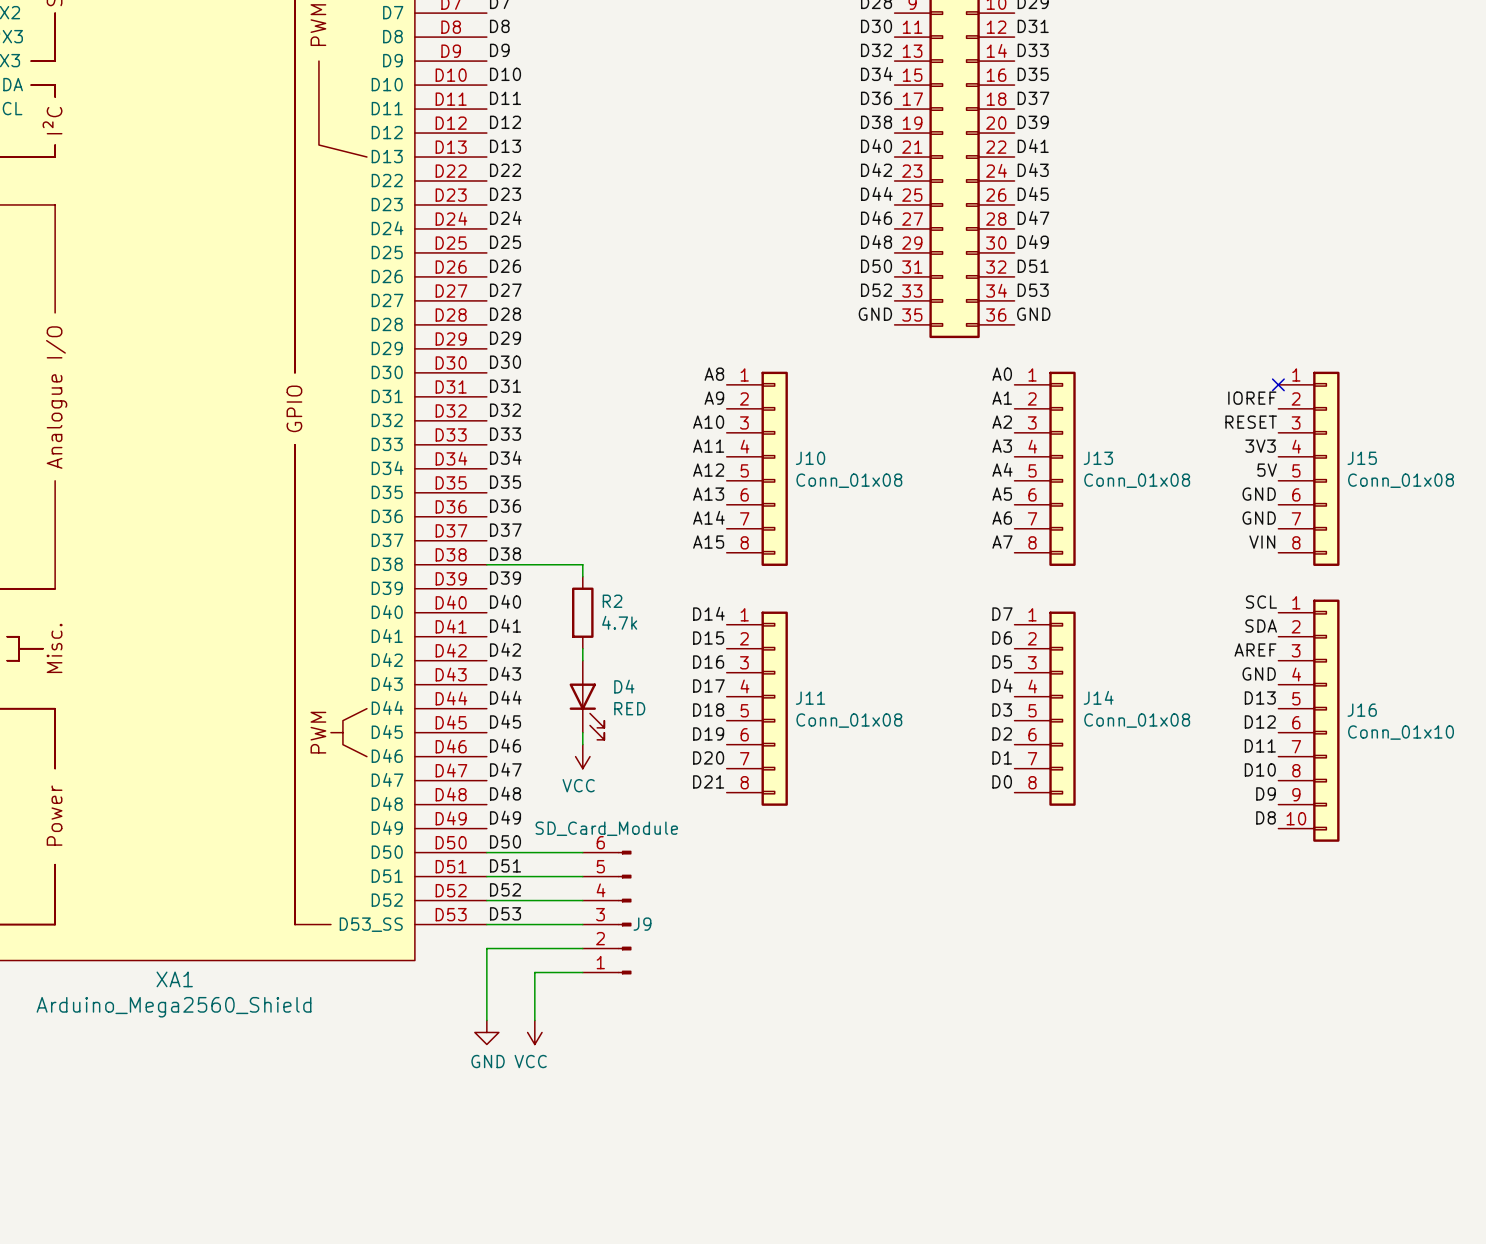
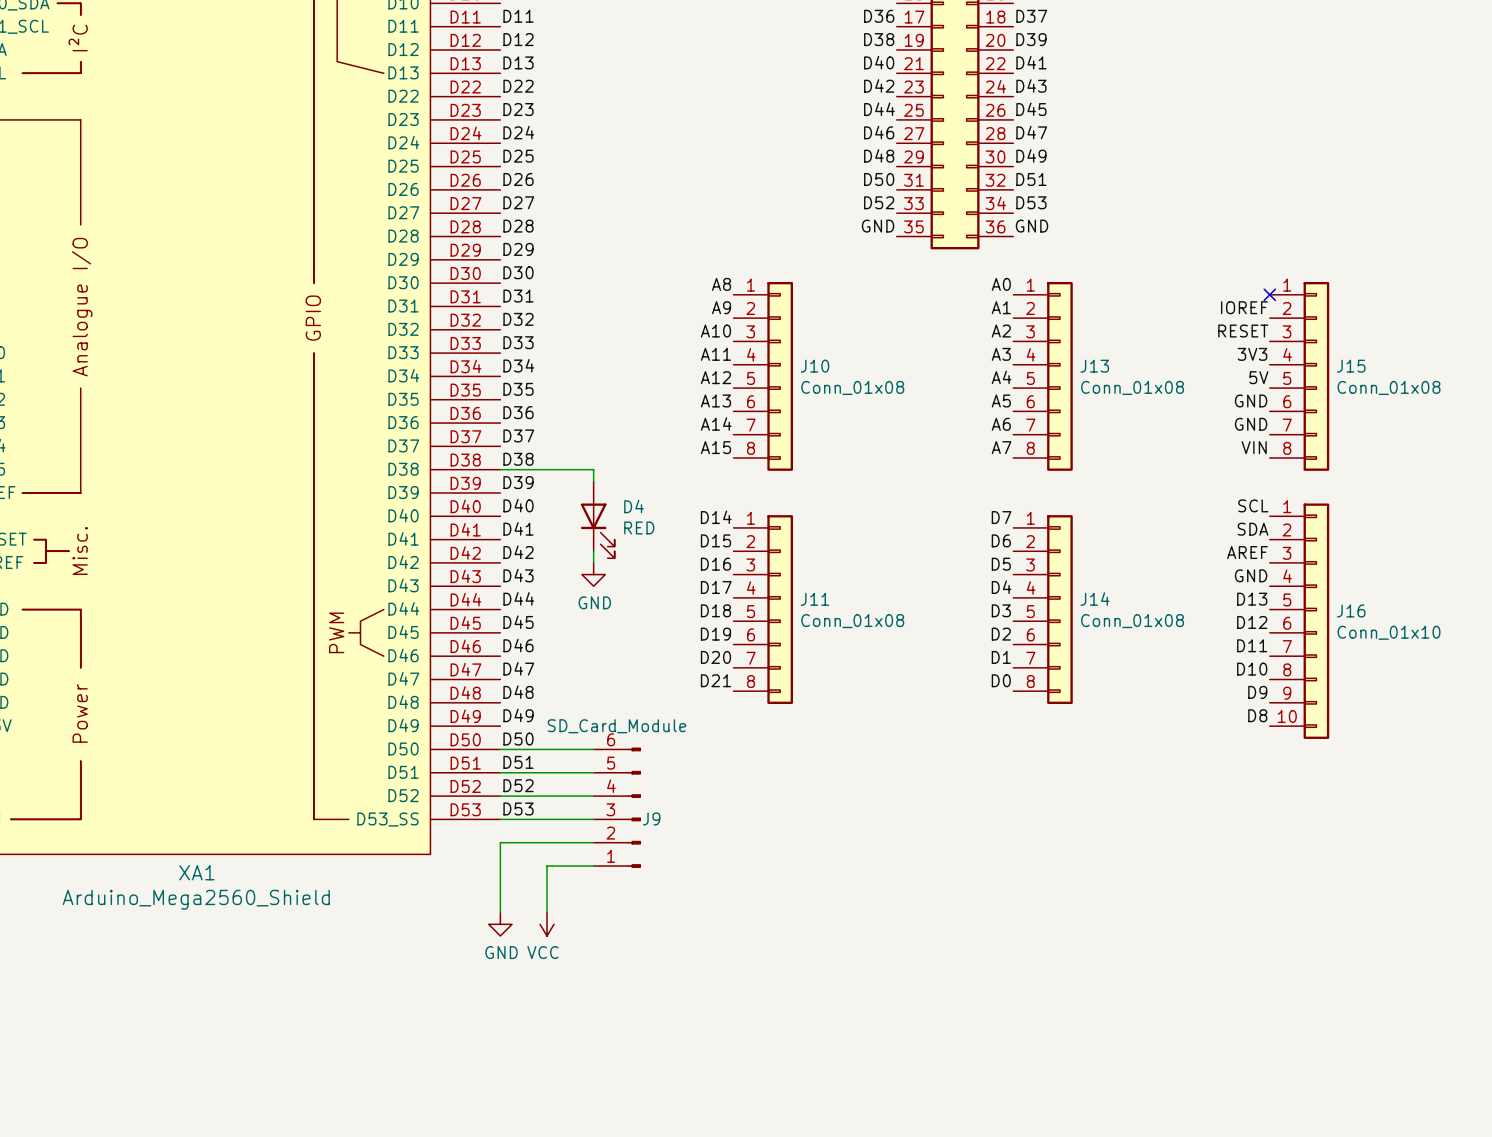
R2: 4.7k (582, 612) -> none
power symbol: none -> GND (593, 574)
D4 position: (586, 700) -> (597, 519)
wire: (582, 732) (582, 744) -> none
power symbol: VCC (582, 756) -> none

